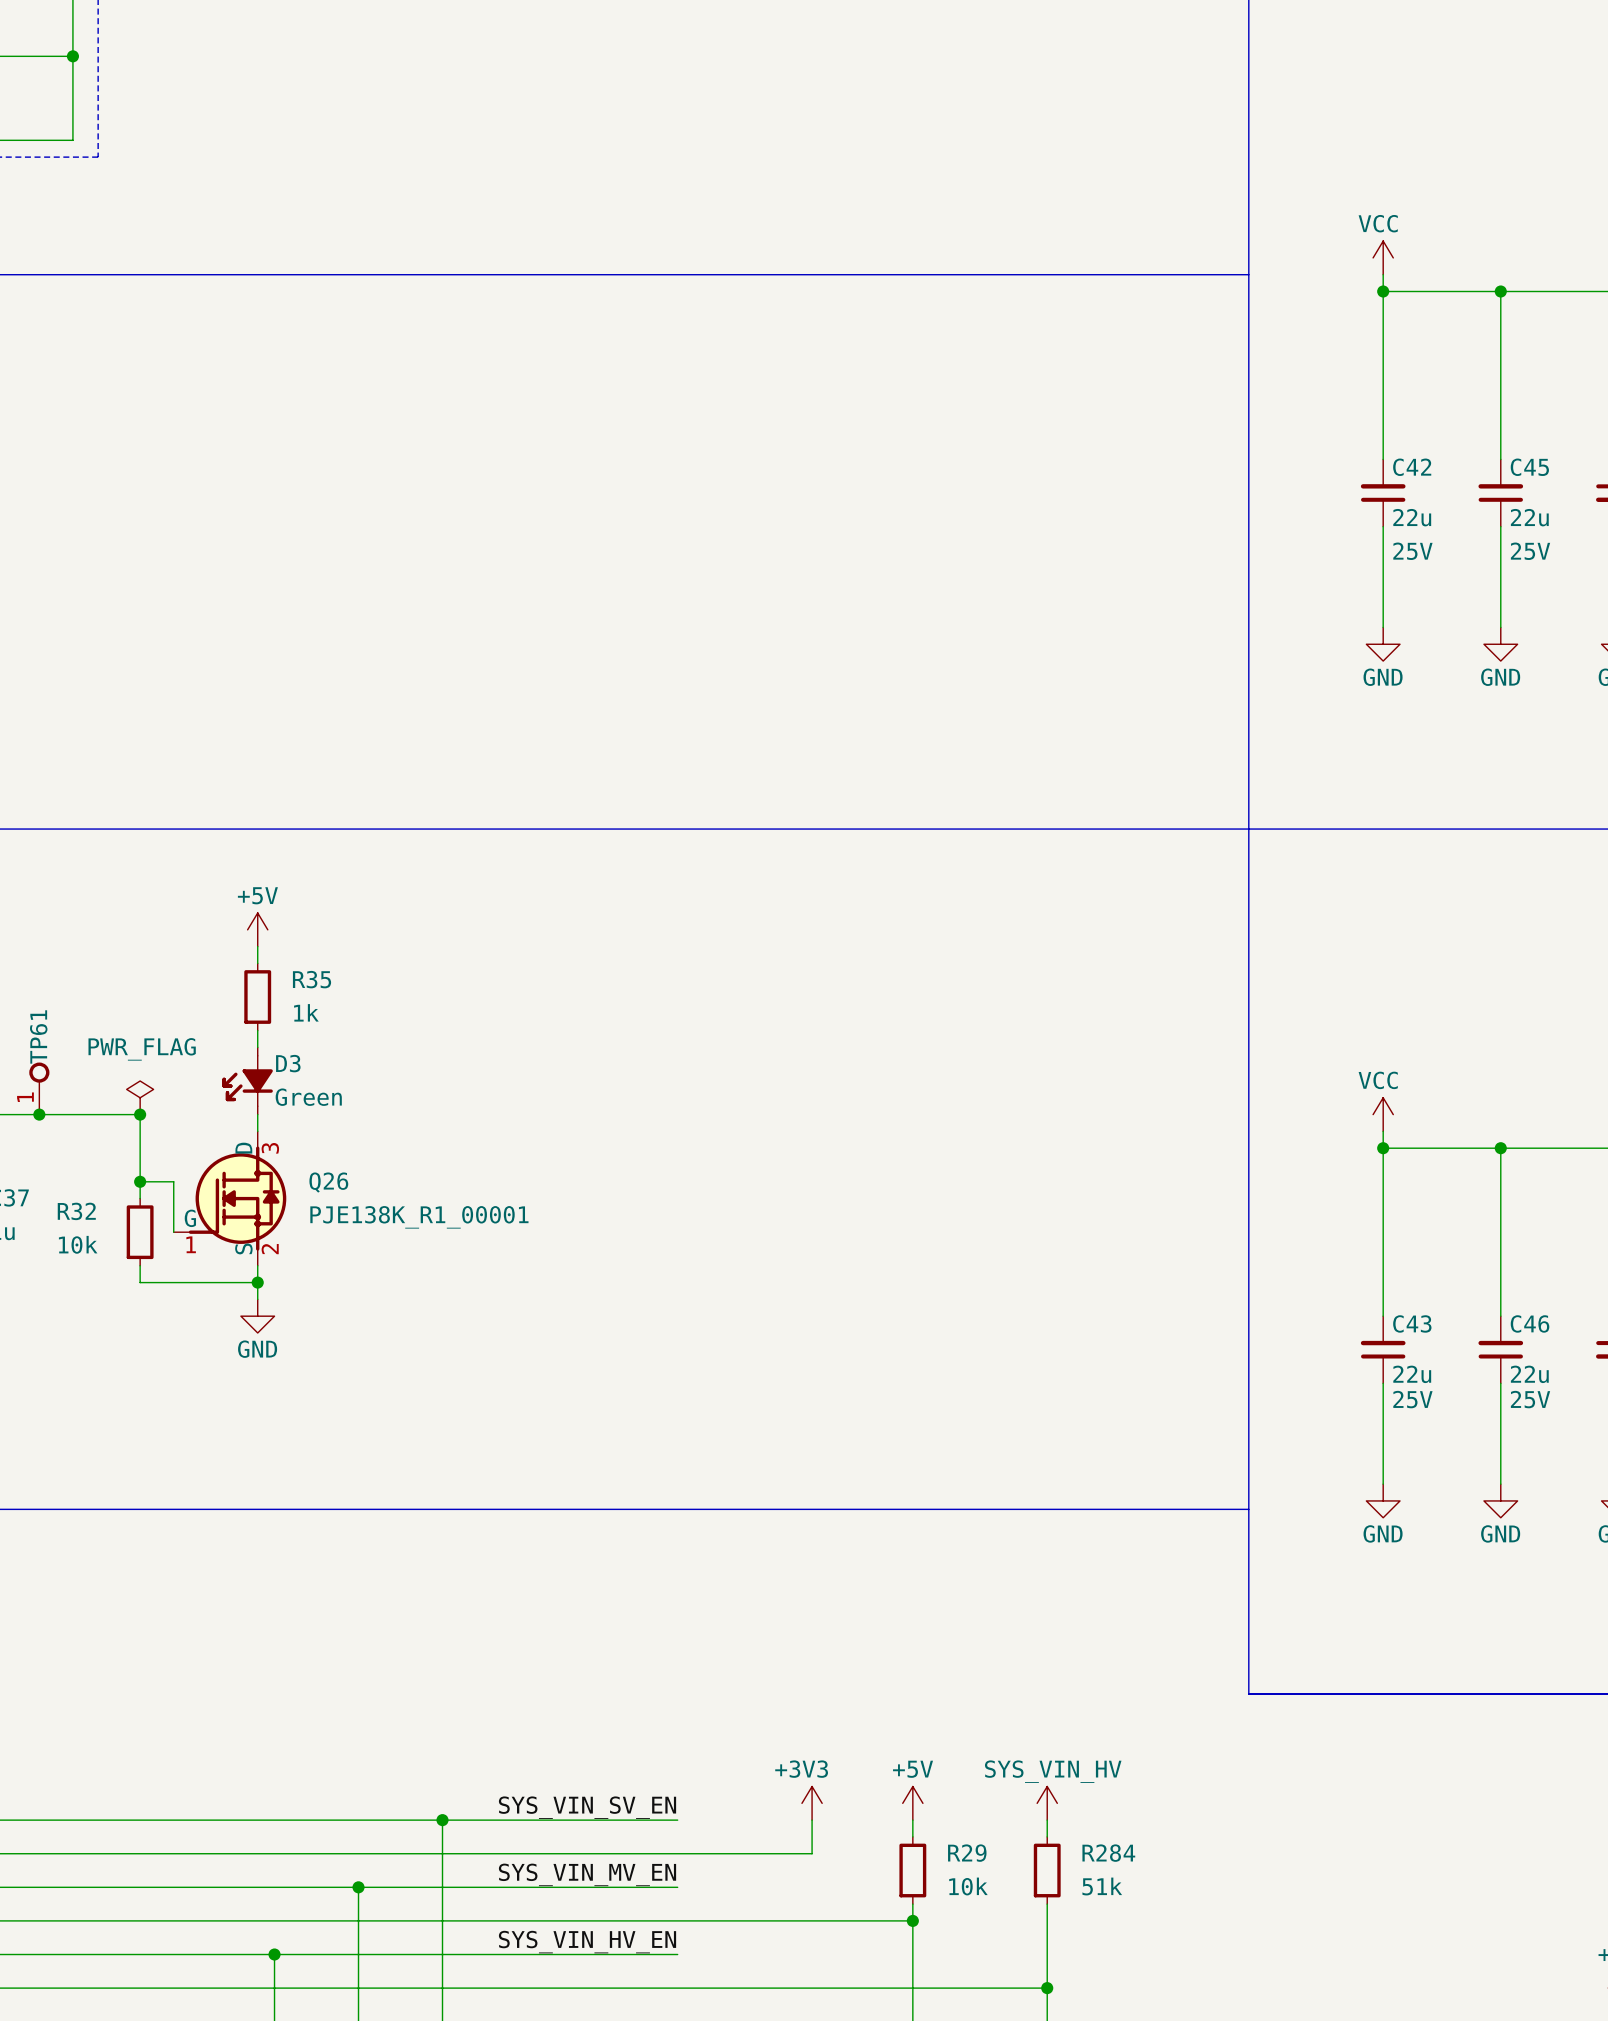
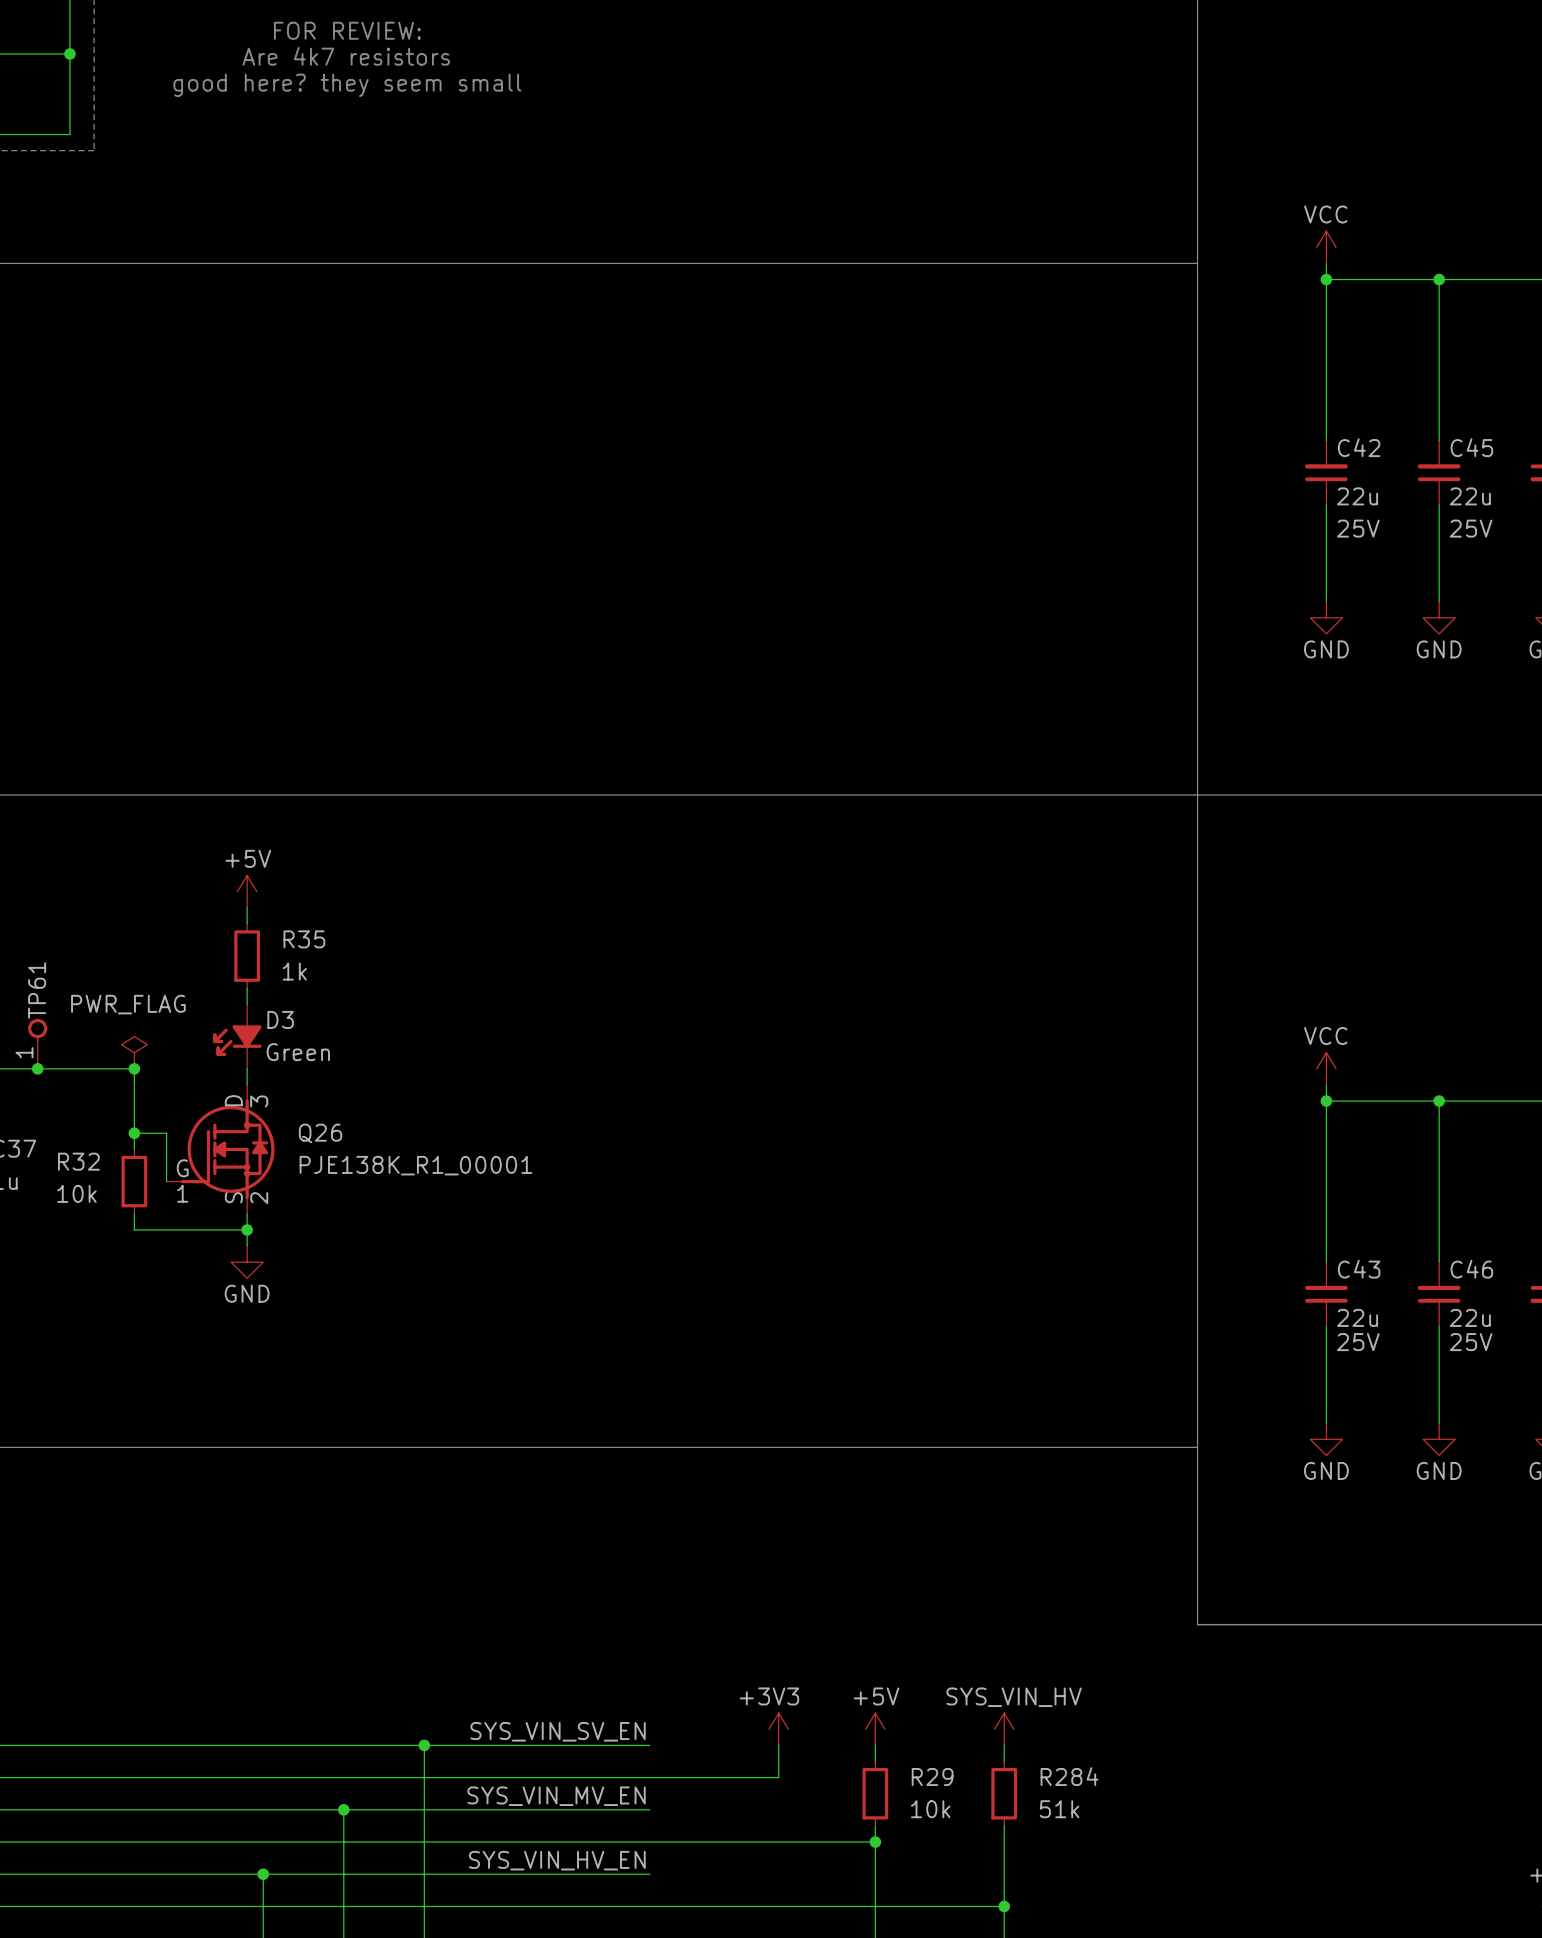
text: none -> FOR REVIEW: (347, 30)
text: none -> Are 4k7 resistors (346, 56)
text: none -> good here? they seem small (347, 85)

